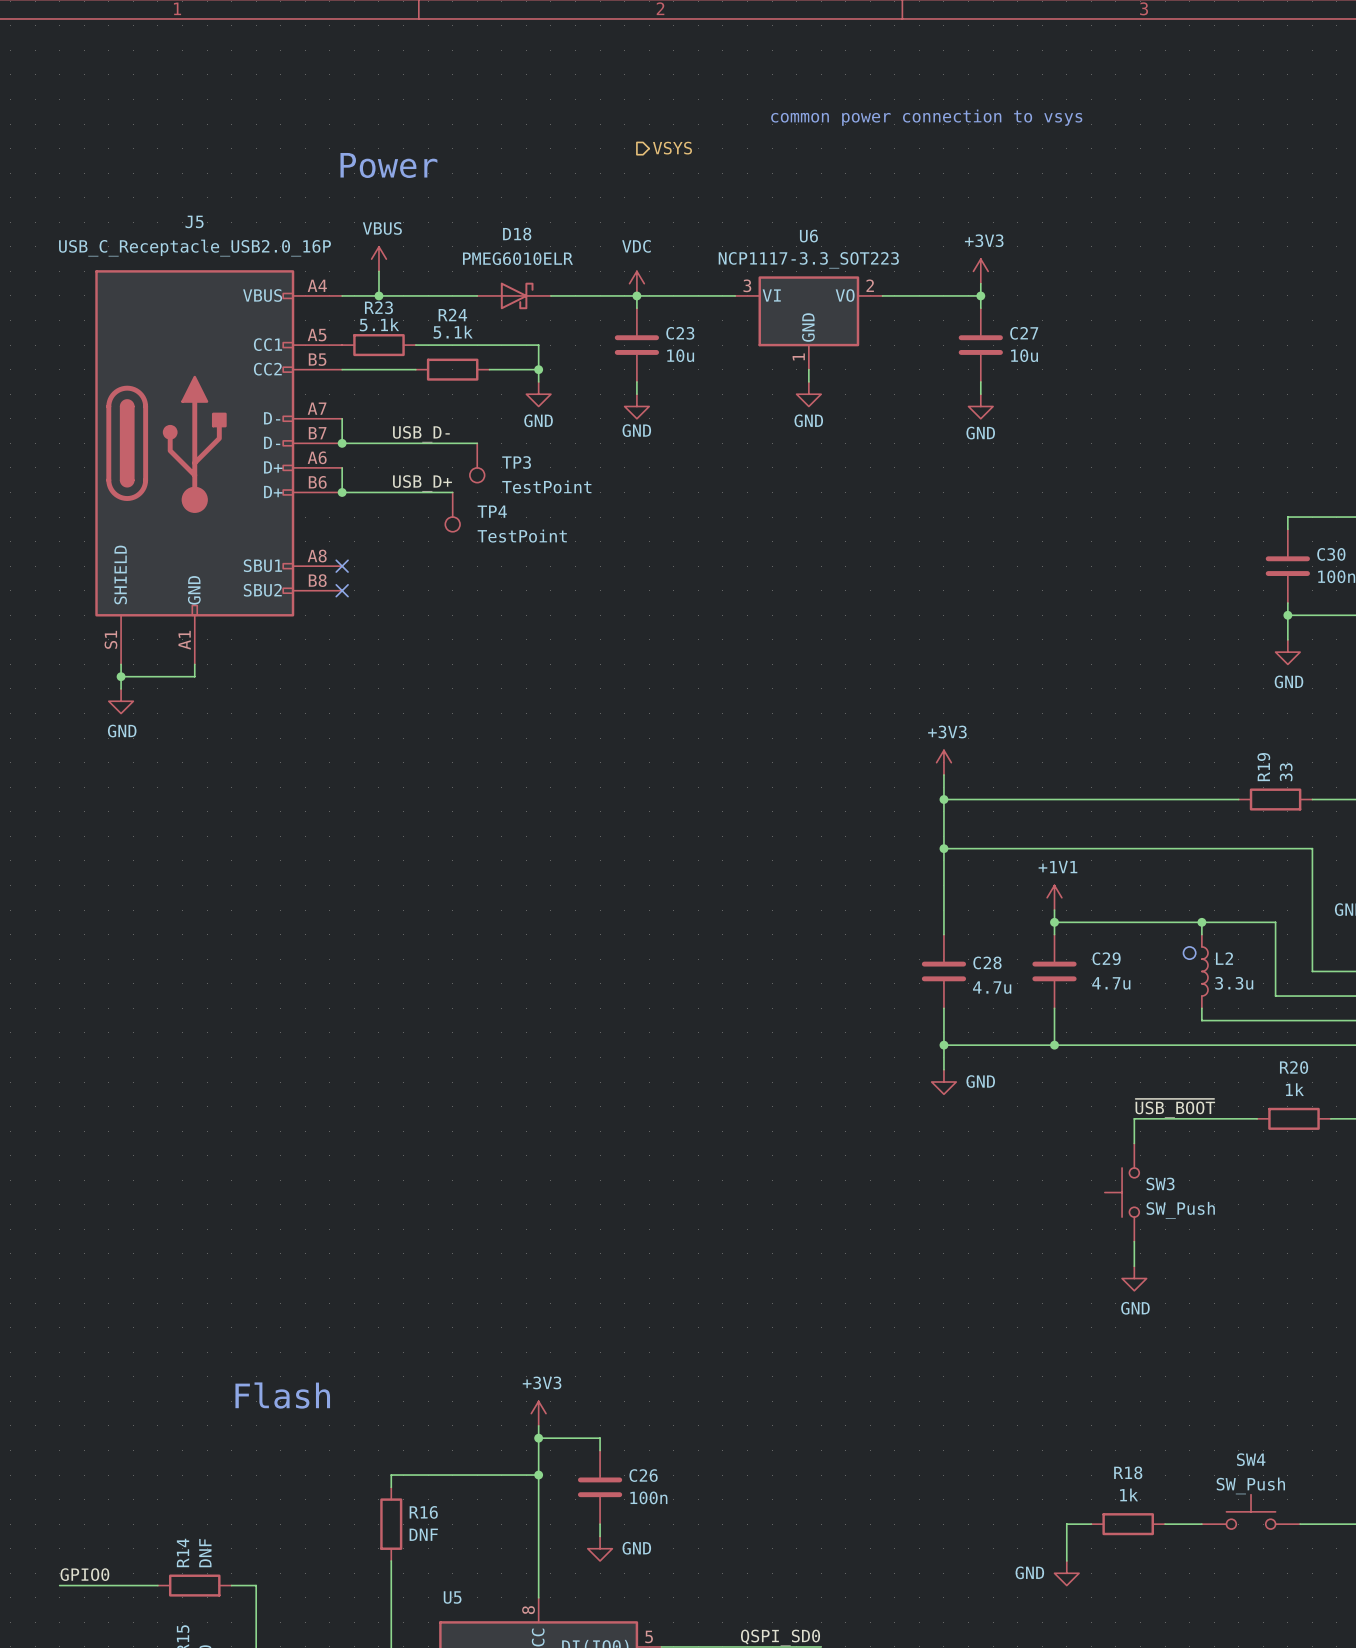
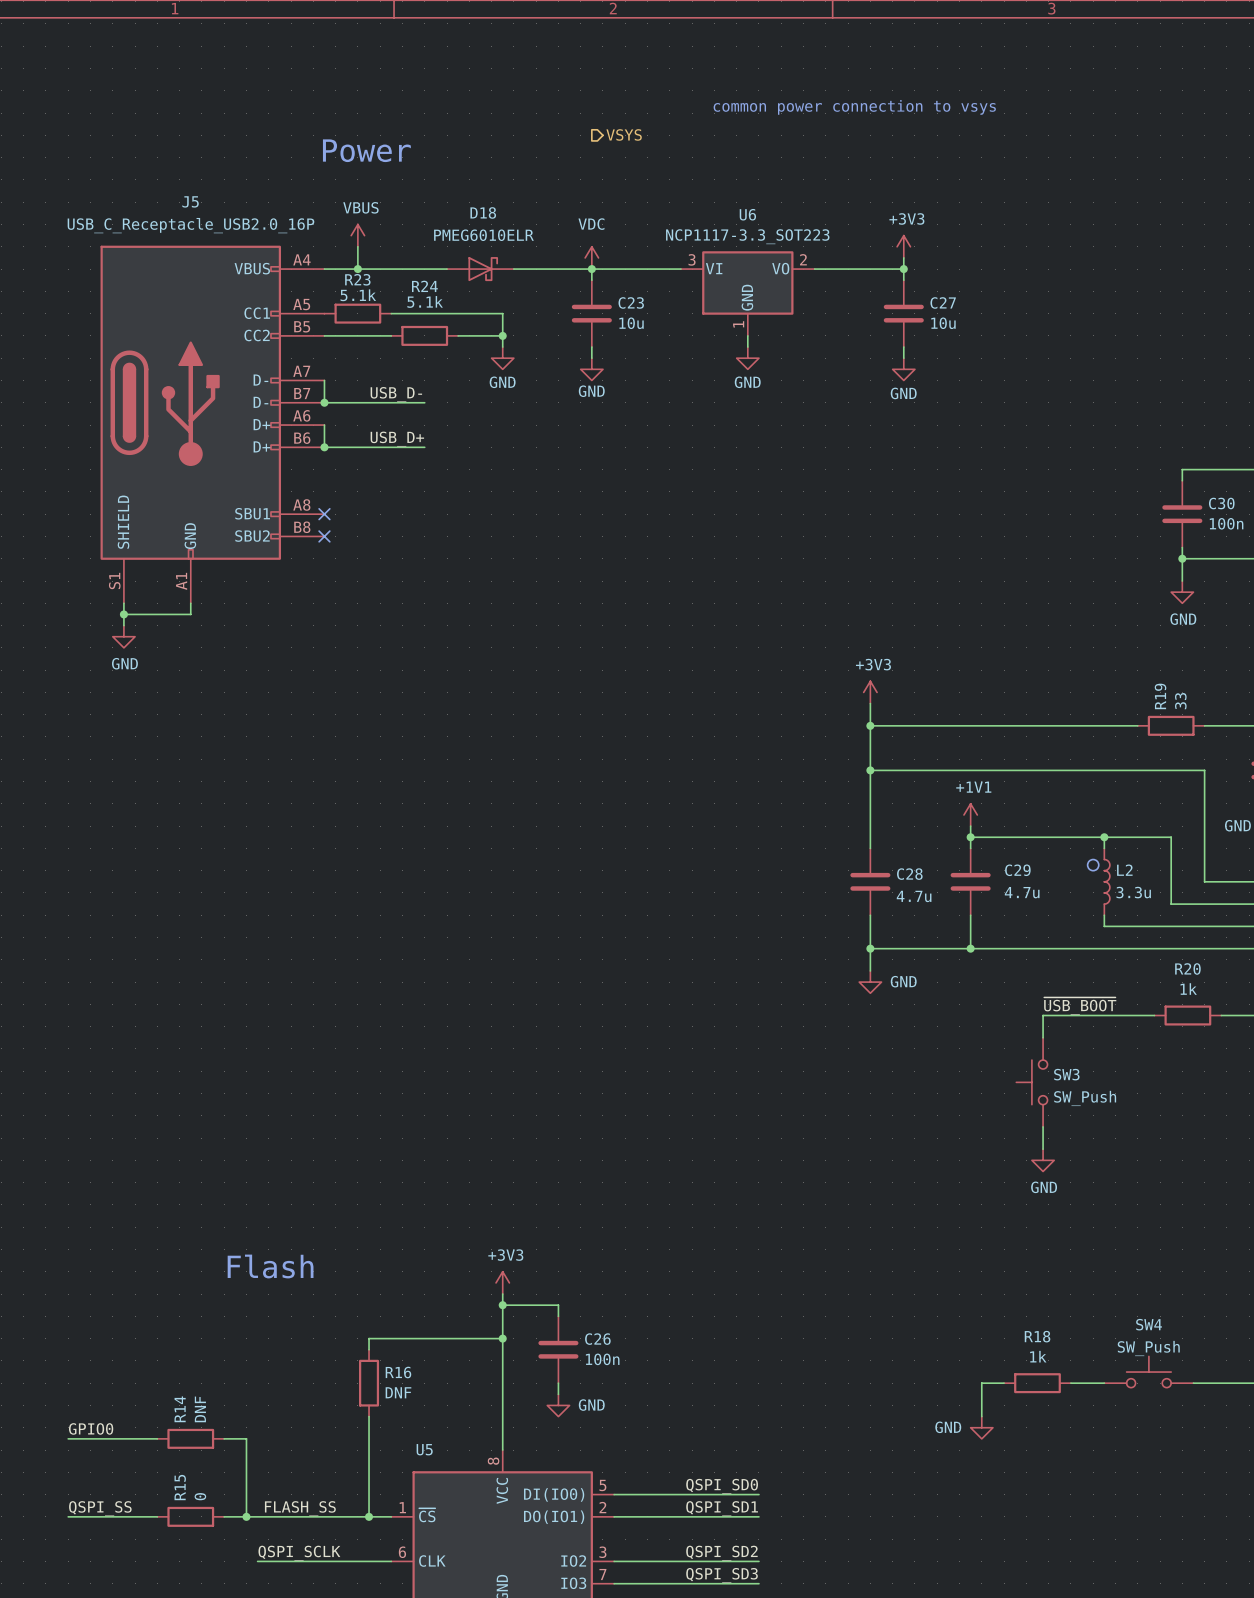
wire: (452, 443) (477, 443) -> none
TP3: TestPoint (477, 462) -> none
TP4: TestPoint (452, 512) -> none

